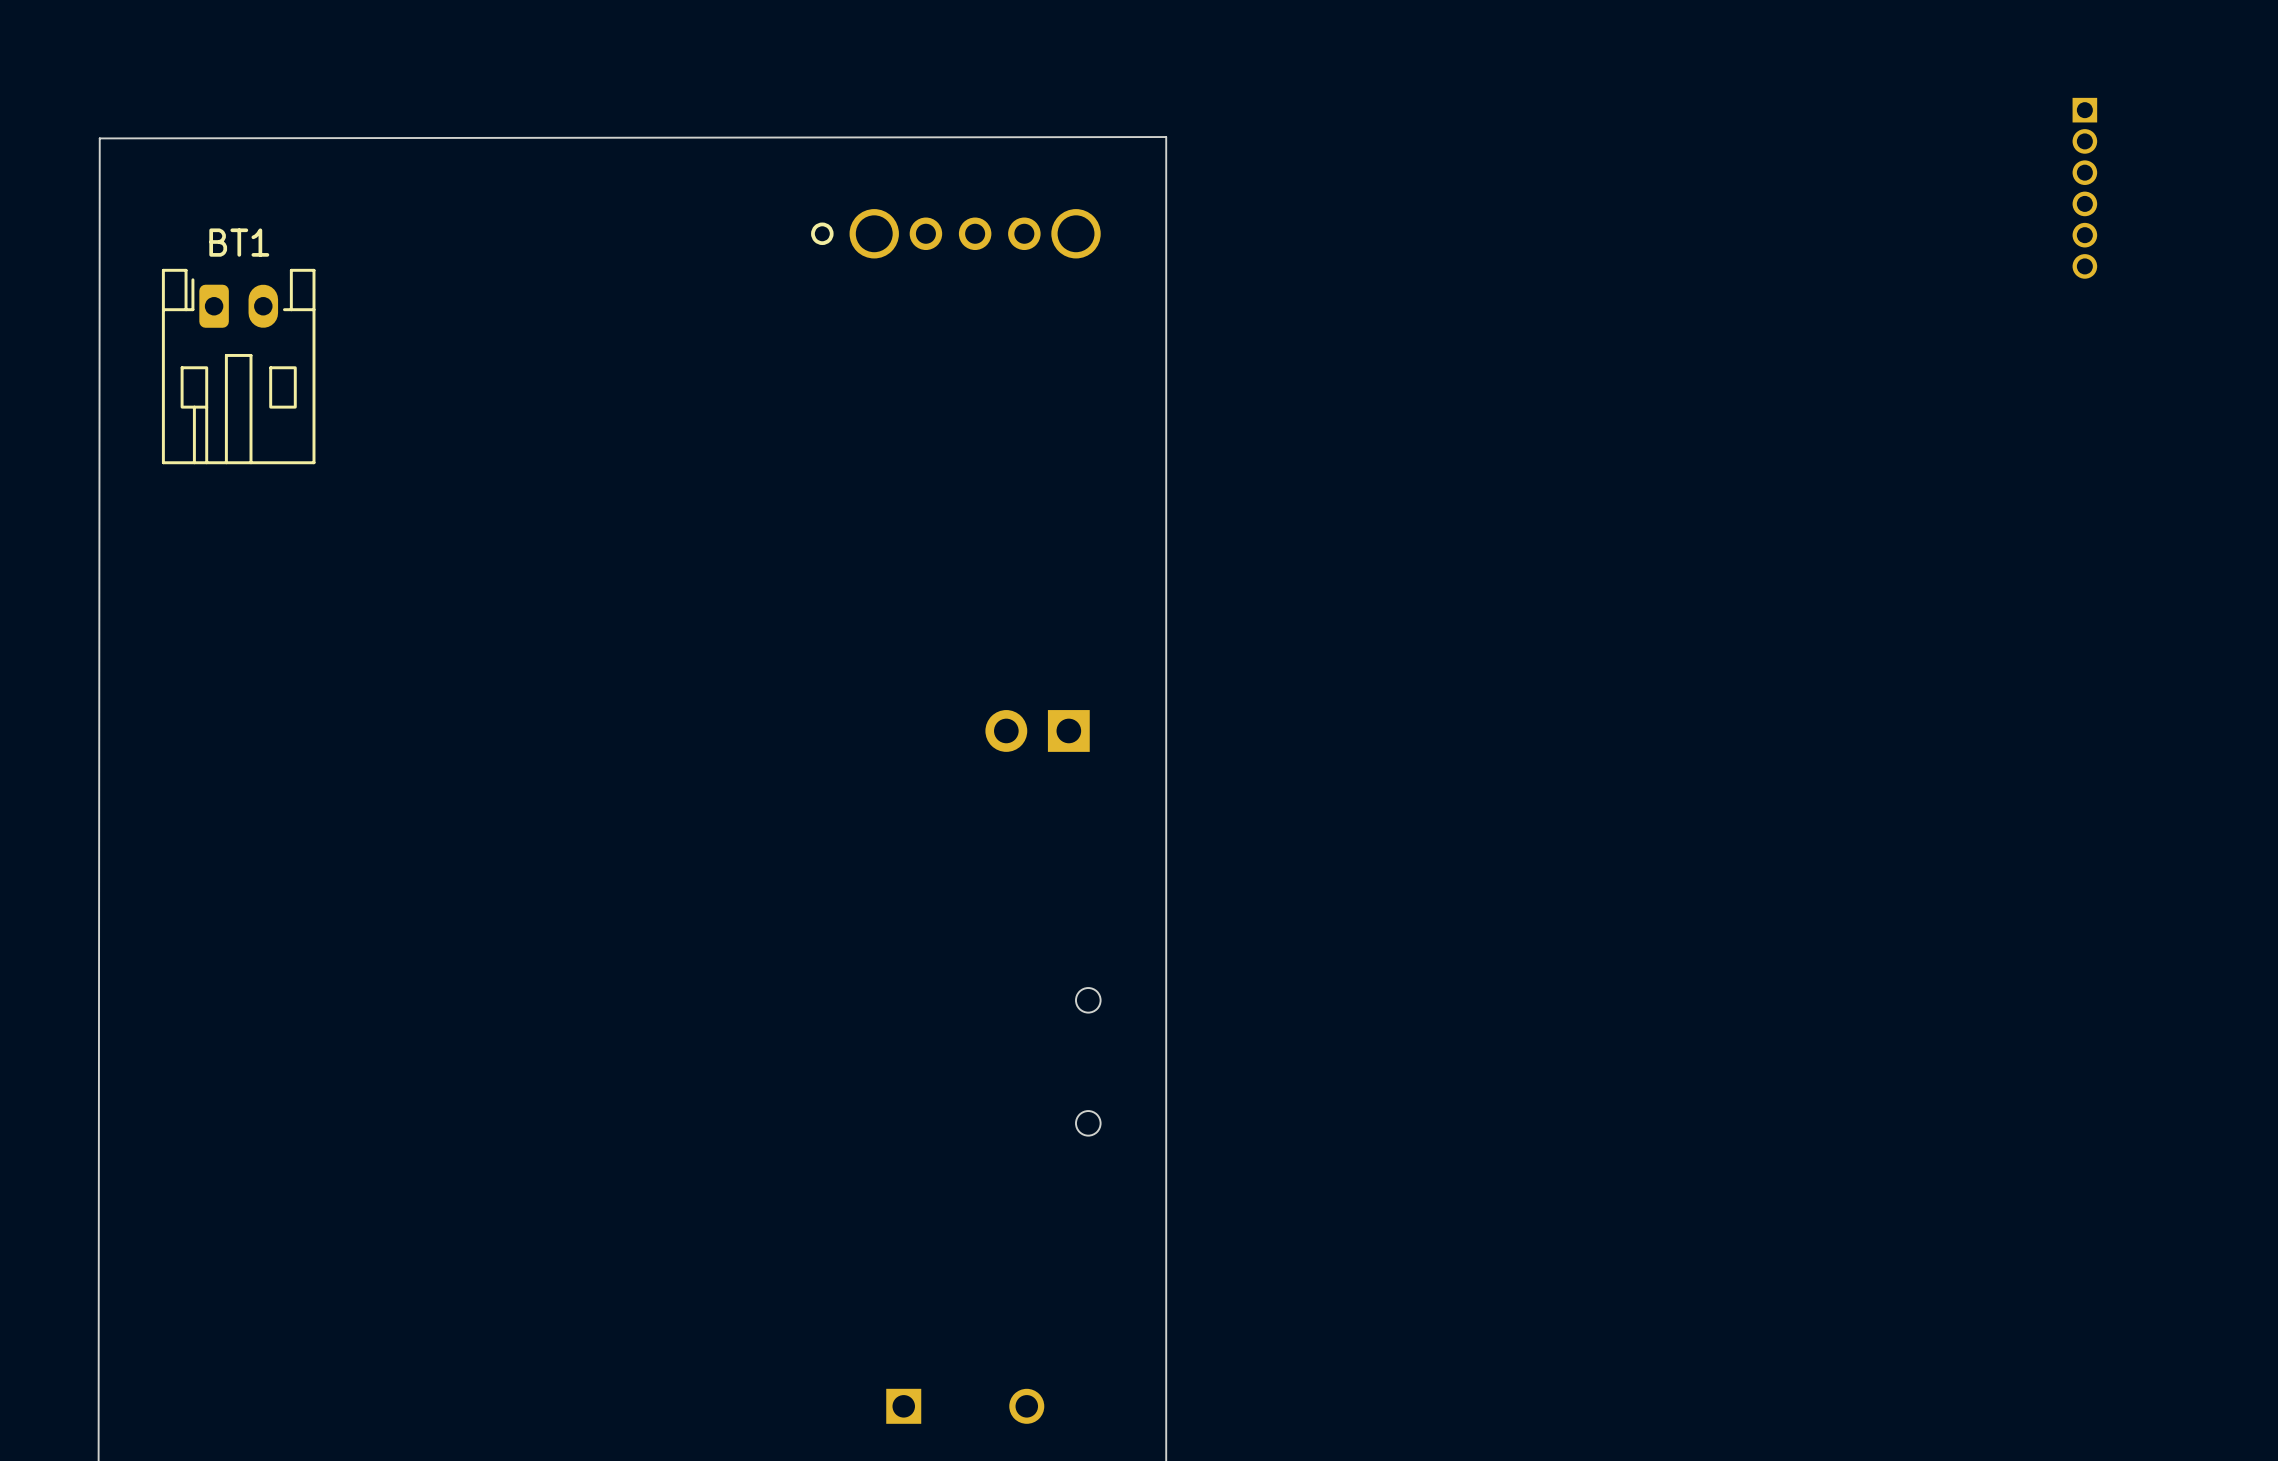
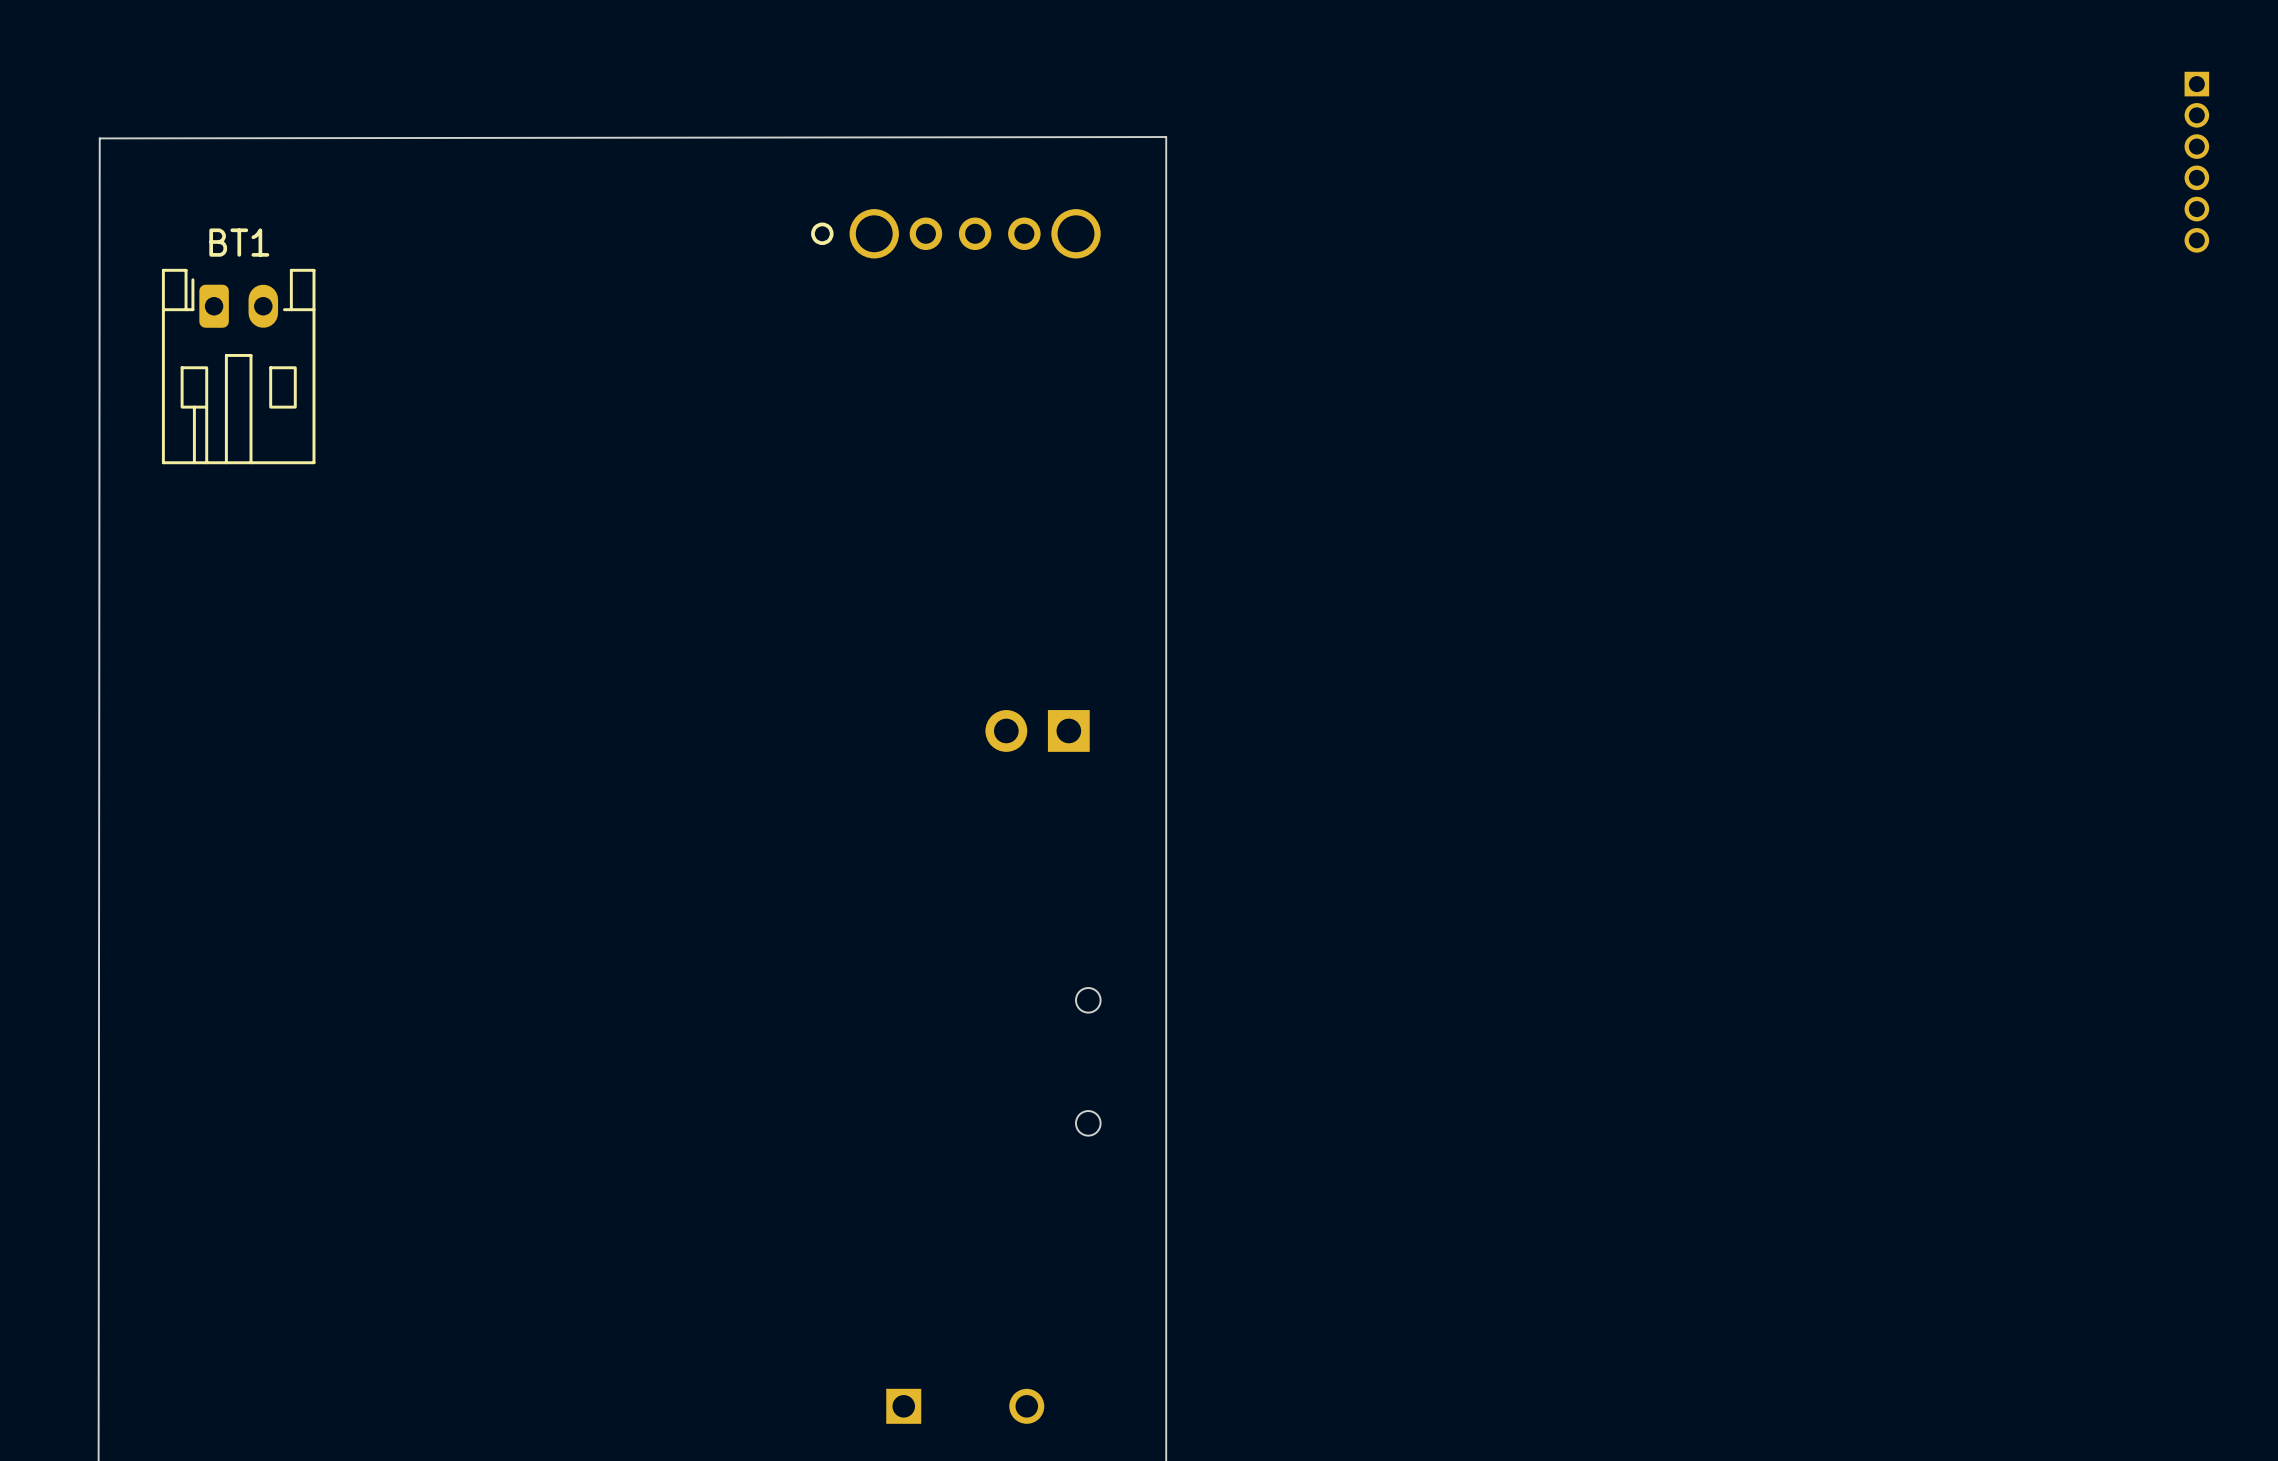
part position: (2084, 188) -> (2196, 162)

